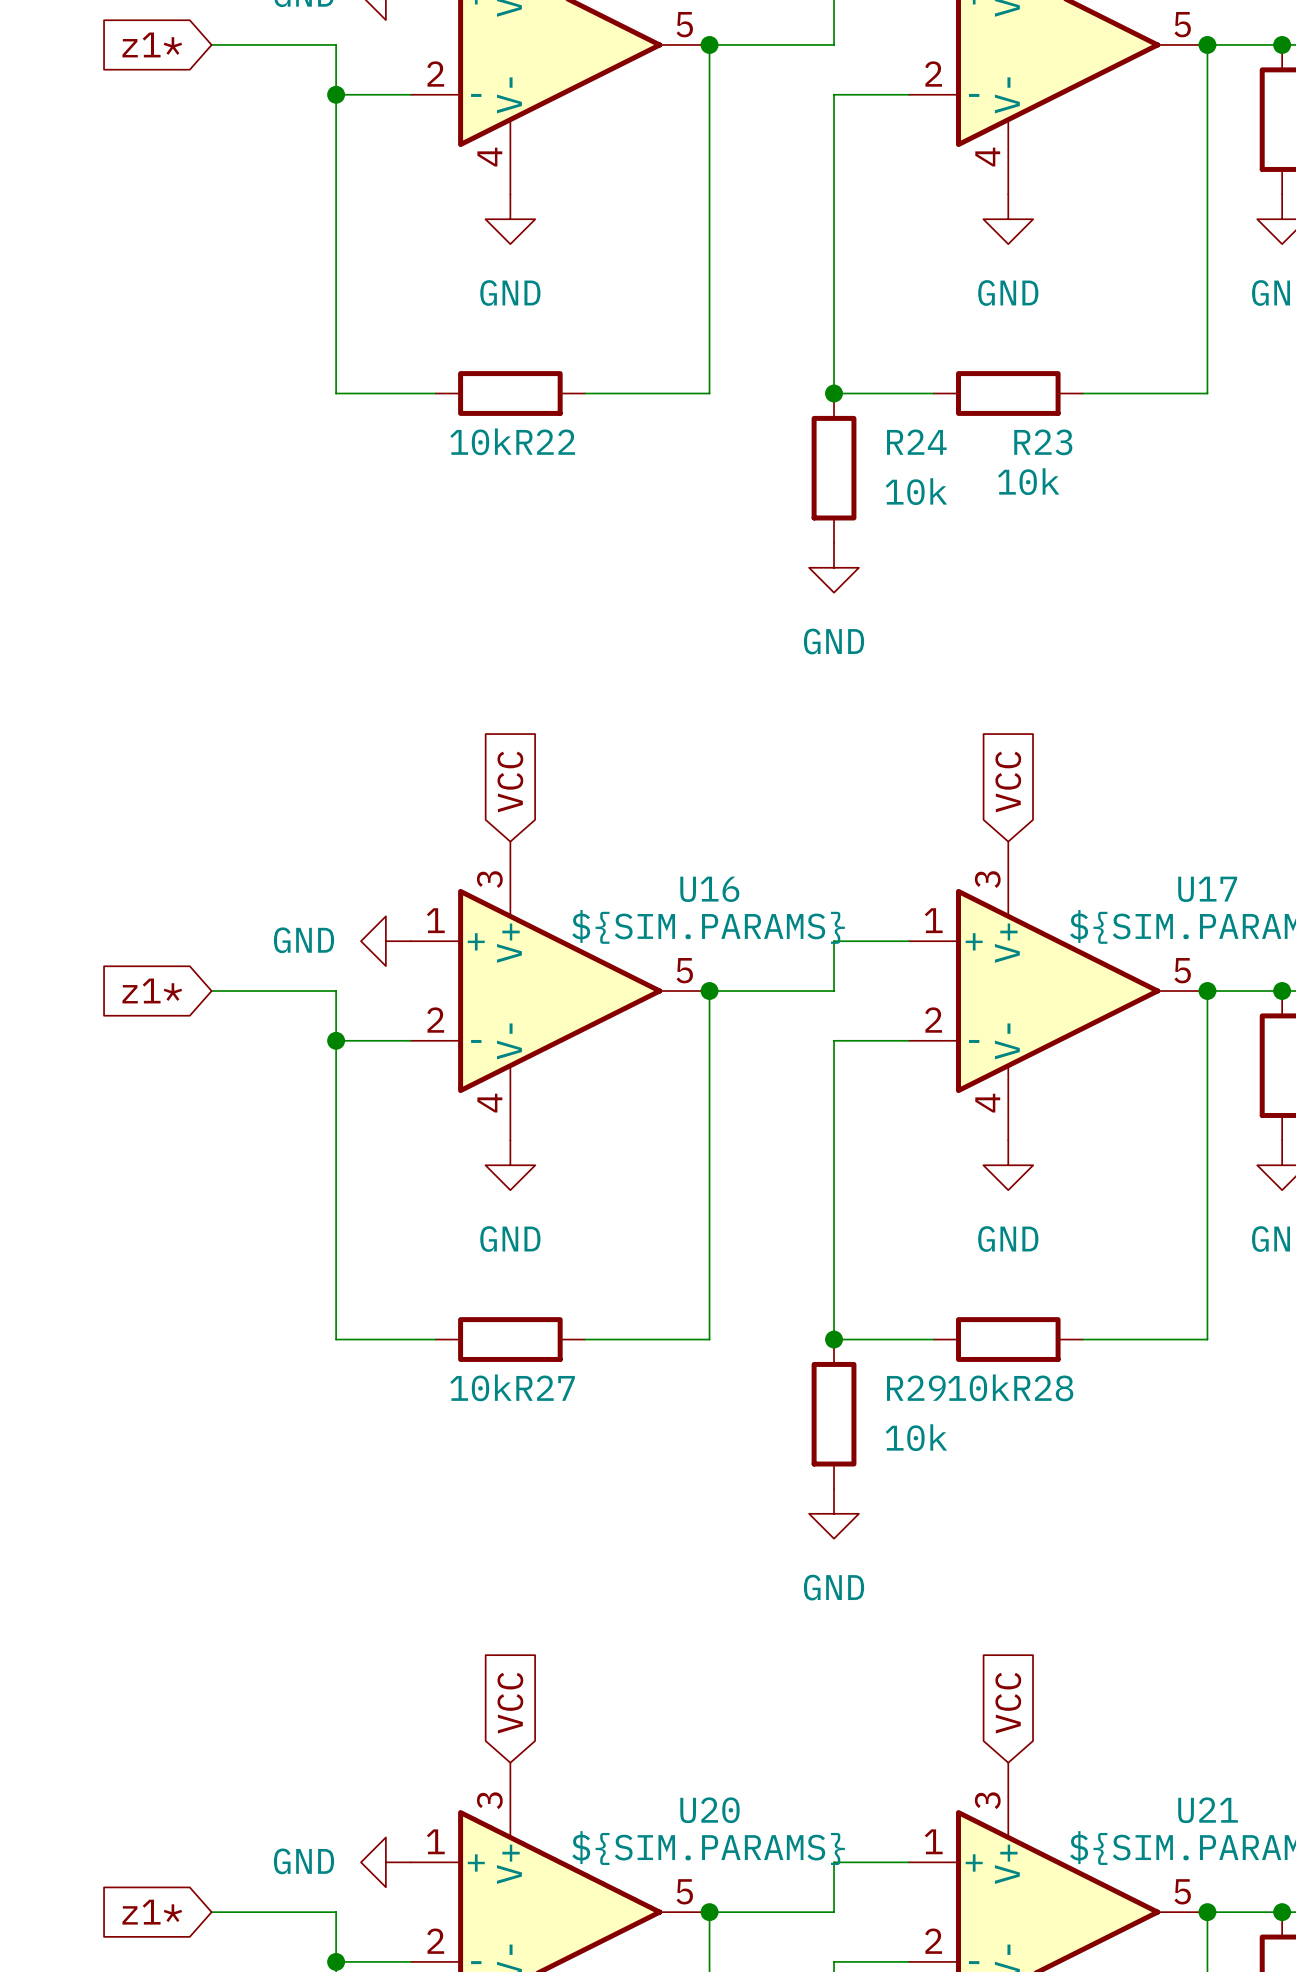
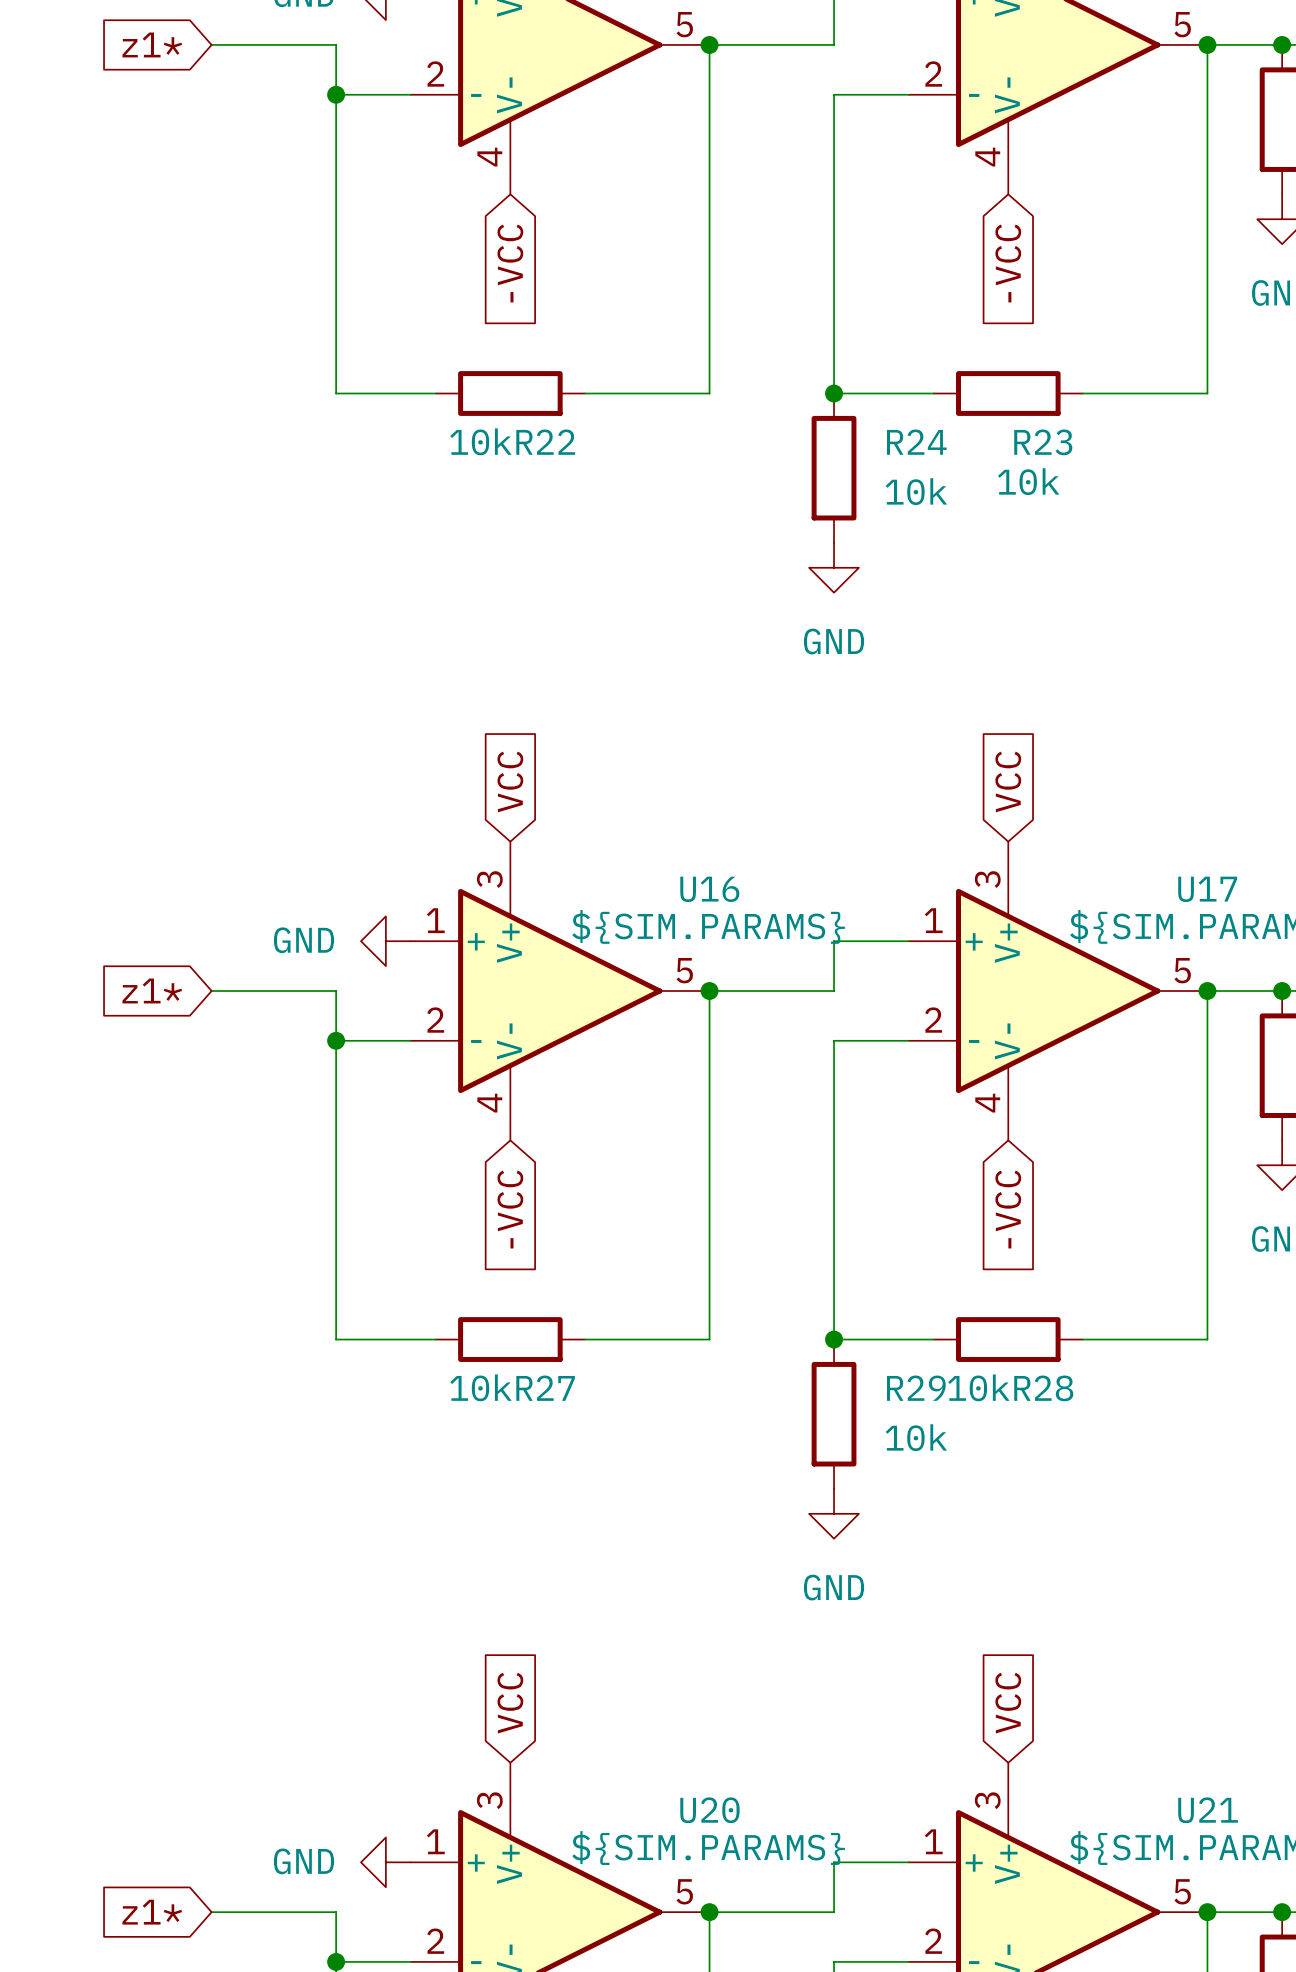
power symbol: GND (510, 219) -> none
power symbol: GND (1008, 219) -> none
global label: none -> -VCC (510, 263)
global label: none -> -VCC (1008, 263)
power symbol: GND (510, 1165) -> none
power symbol: GND (1008, 1165) -> none
global label: none -> -VCC (510, 1209)
global label: none -> -VCC (1008, 1209)

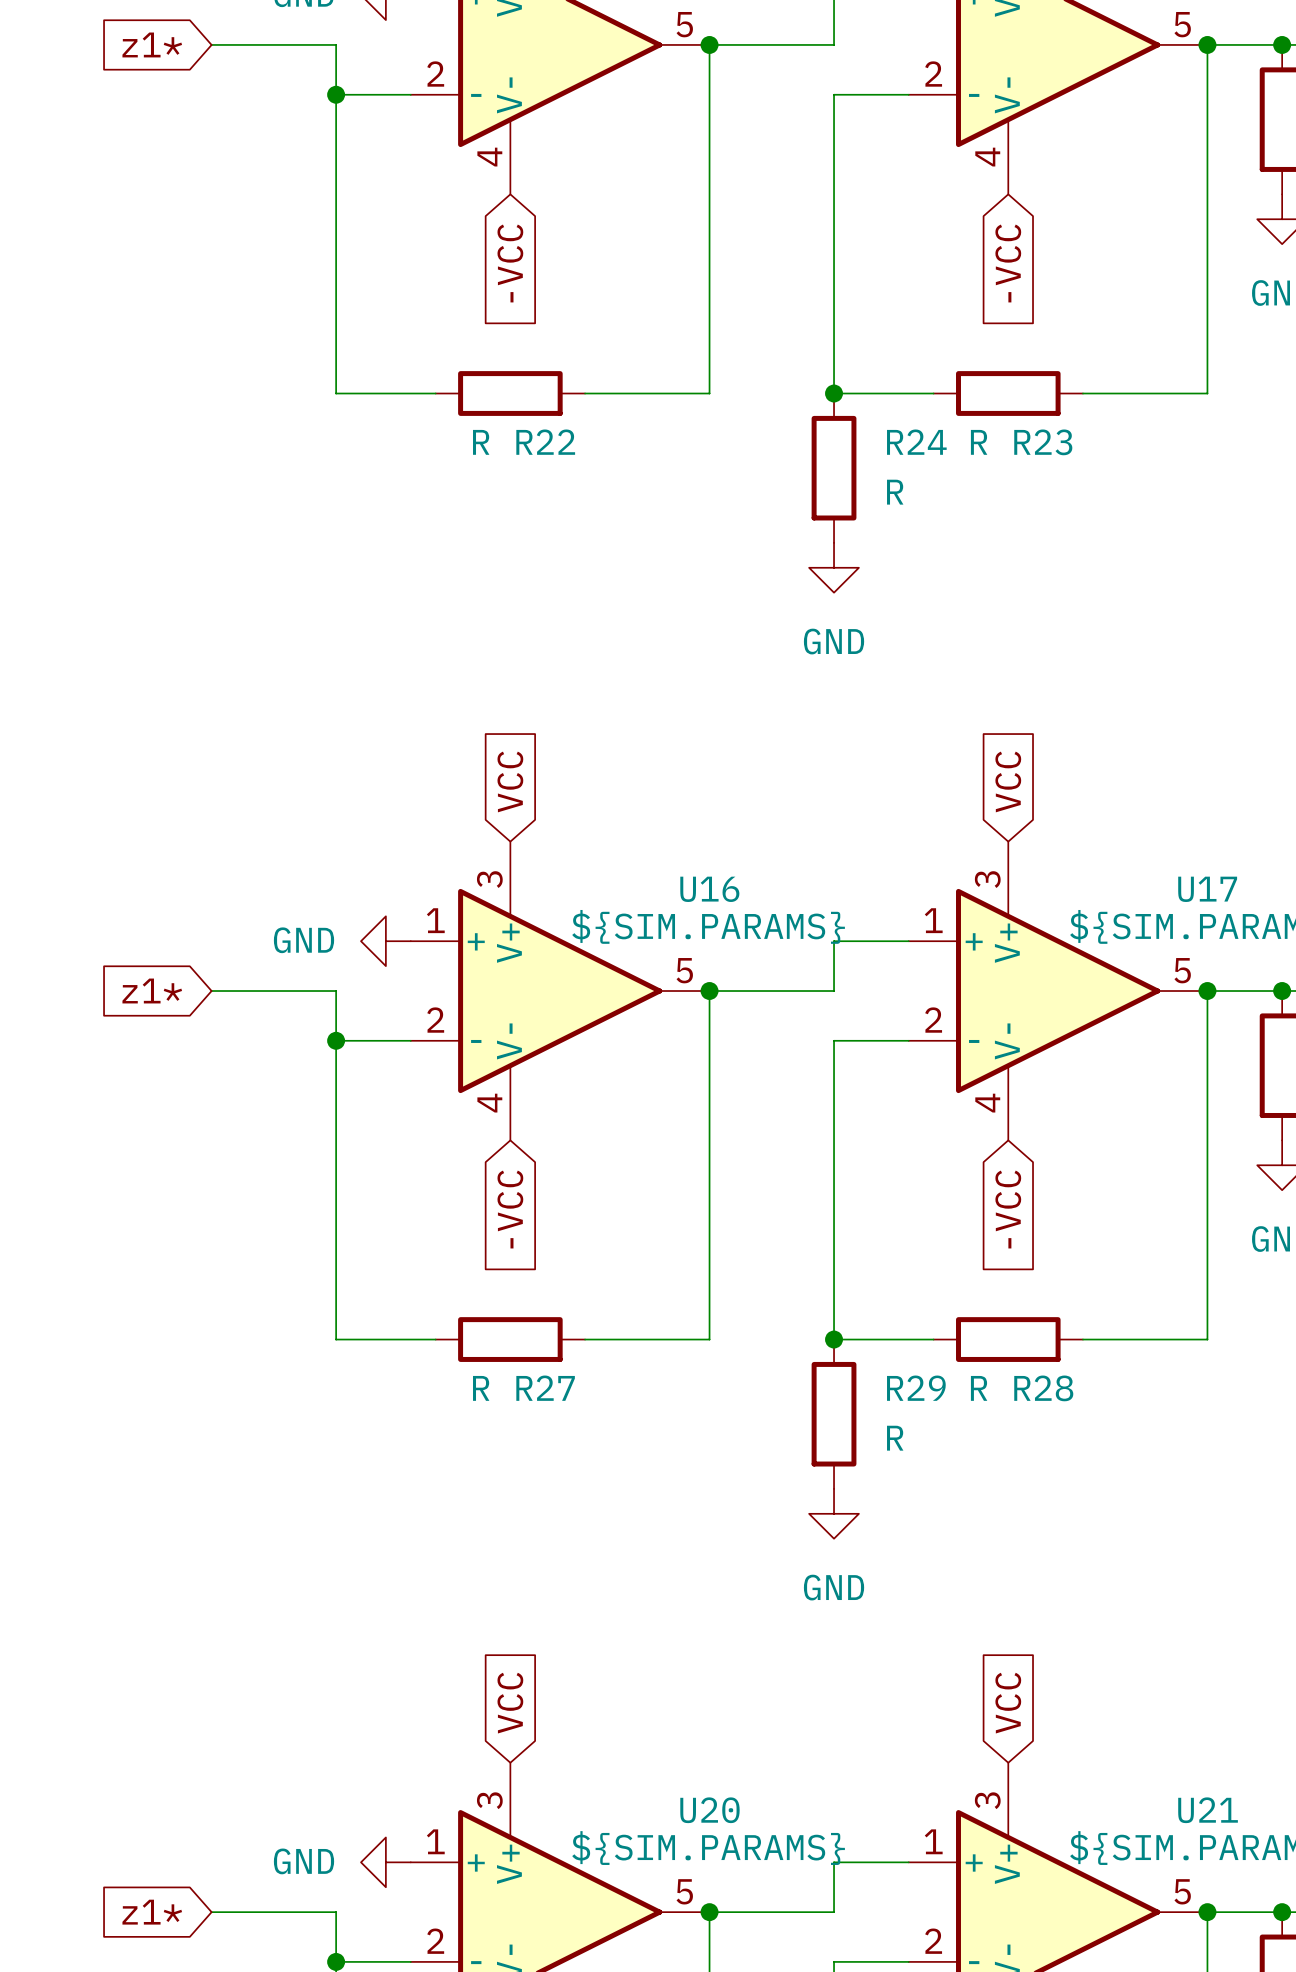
R22 value: 10k (480, 441) -> R (481, 442)
R23 value: 10k (1028, 481) -> R (979, 442)
R24 value: 10k (916, 491) -> R (895, 492)
R27 value: 10k (480, 1387) -> R (481, 1388)
R28 value: 10k (978, 1387) -> R (979, 1388)
R29 value: 10k (916, 1437) -> R (895, 1438)

